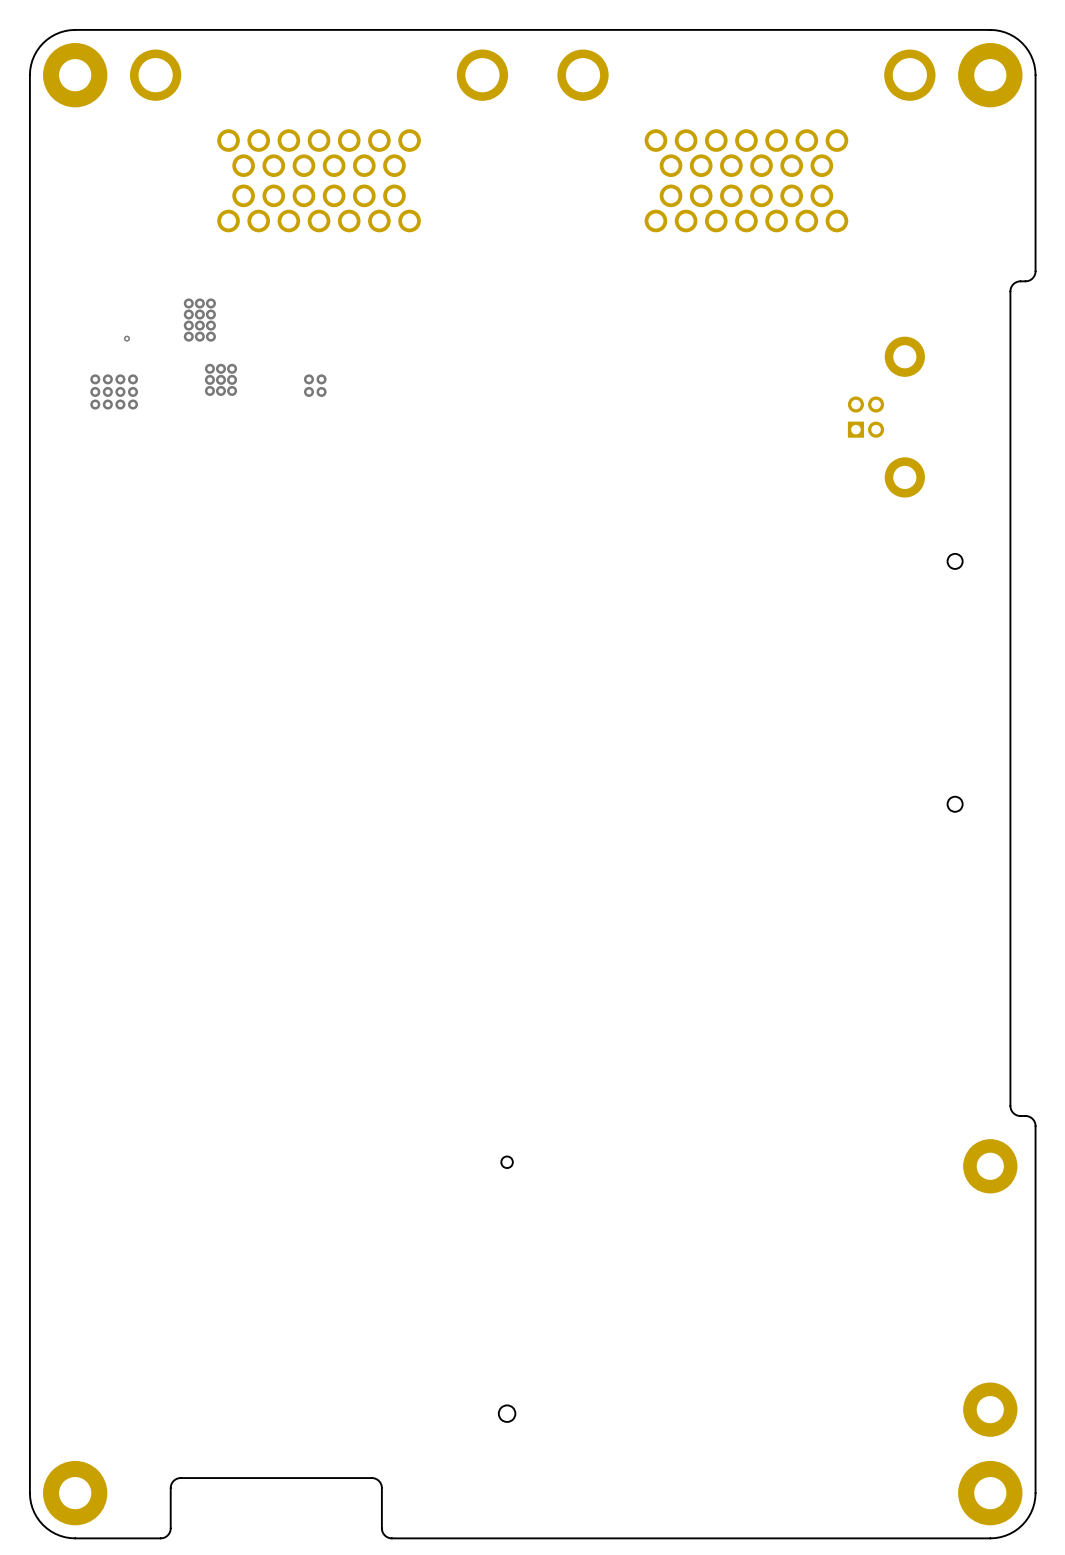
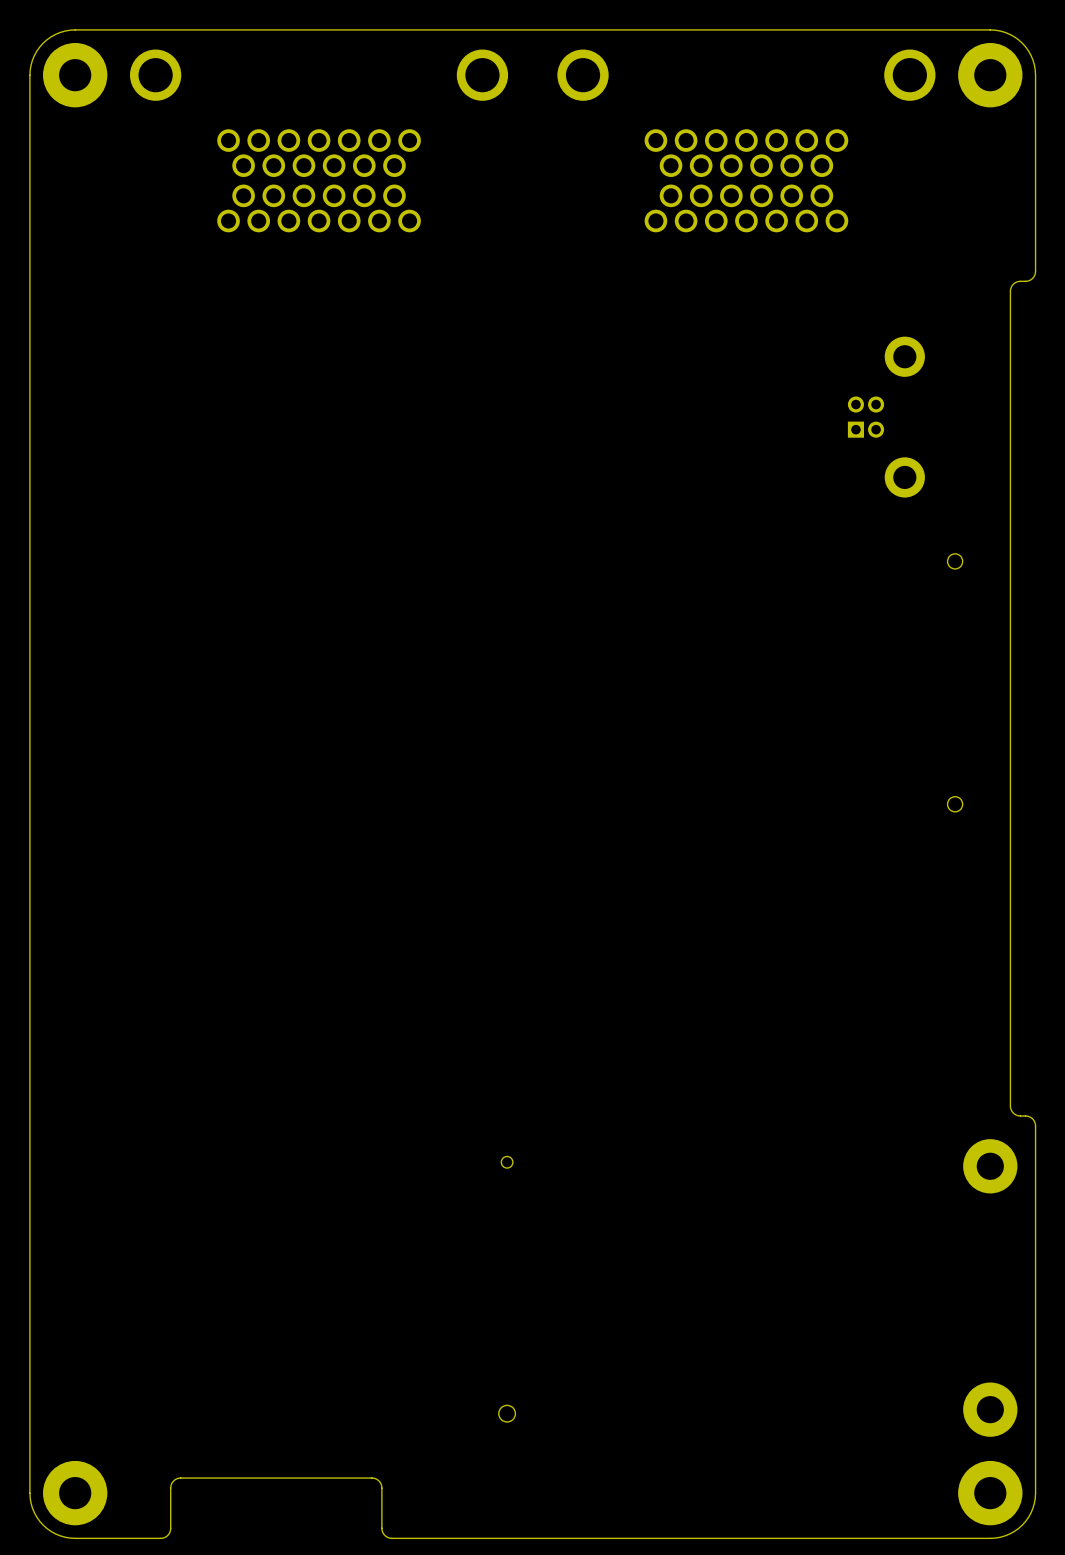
via: (188, 303) -> none
via: (199, 303) -> none
via: (210, 303) -> none
via: (188, 314) -> none
via: (199, 314) -> none
via: (210, 314) -> none
via: (188, 325) -> none
via: (199, 325) -> none
via: (210, 325) -> none
via: (188, 336) -> none
via: (199, 336) -> none
via: (210, 336) -> none
via: (126, 338) -> none
via: (209, 368) -> none
via: (220, 368) -> none
via: (232, 368) -> none
via: (95, 379) -> none
via: (107, 379) -> none
via: (120, 379) -> none
via: (133, 379) -> none
via: (209, 379) -> none
via: (220, 379) -> none
via: (232, 379) -> none
via: (308, 379) -> none
via: (321, 379) -> none
via: (209, 390) -> none
via: (220, 390) -> none
via: (232, 390) -> none
via: (95, 391) -> none
via: (107, 391) -> none
via: (120, 391) -> none
via: (133, 391) -> none
via: (308, 391) -> none
via: (321, 391) -> none
via: (95, 404) -> none
via: (107, 404) -> none
via: (120, 404) -> none
via: (133, 404) -> none

